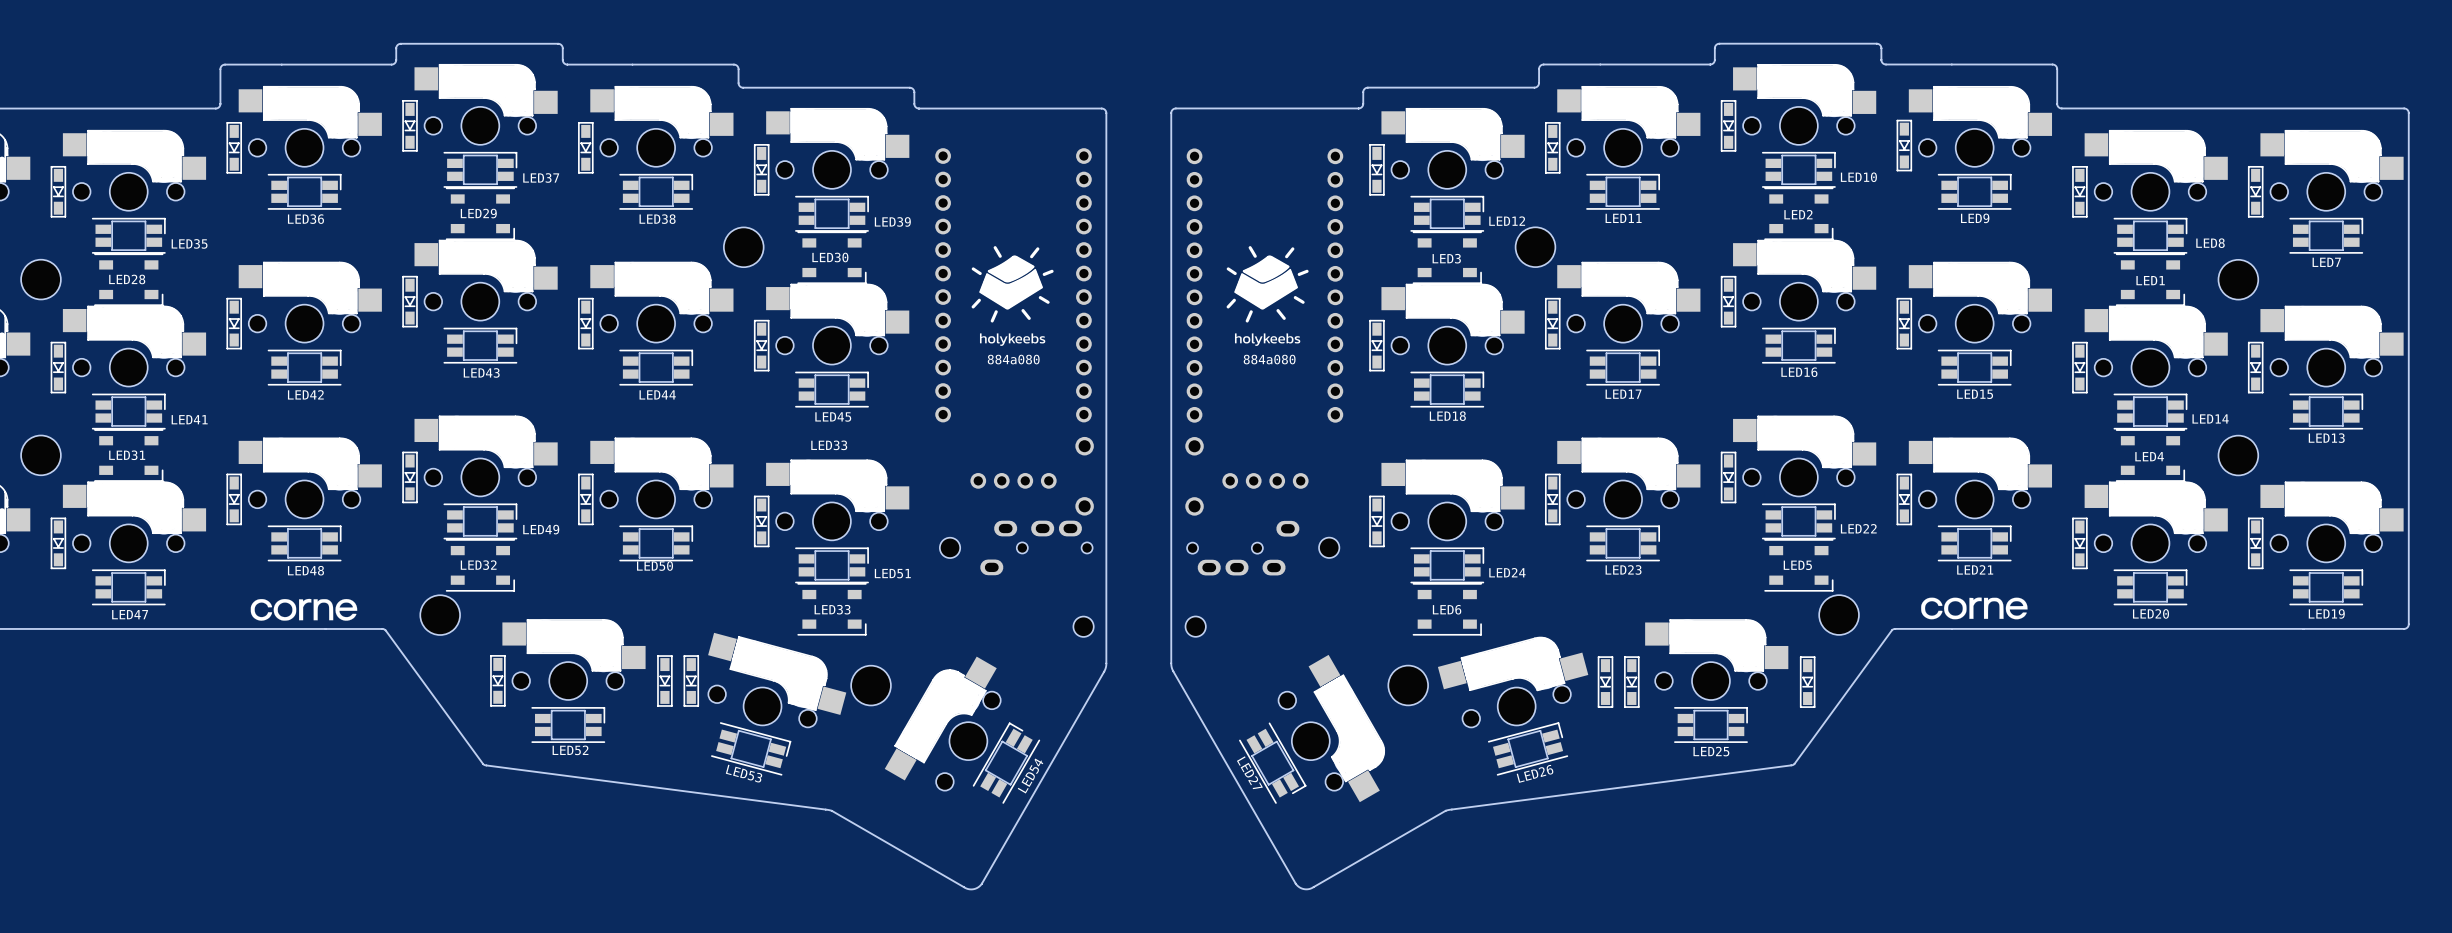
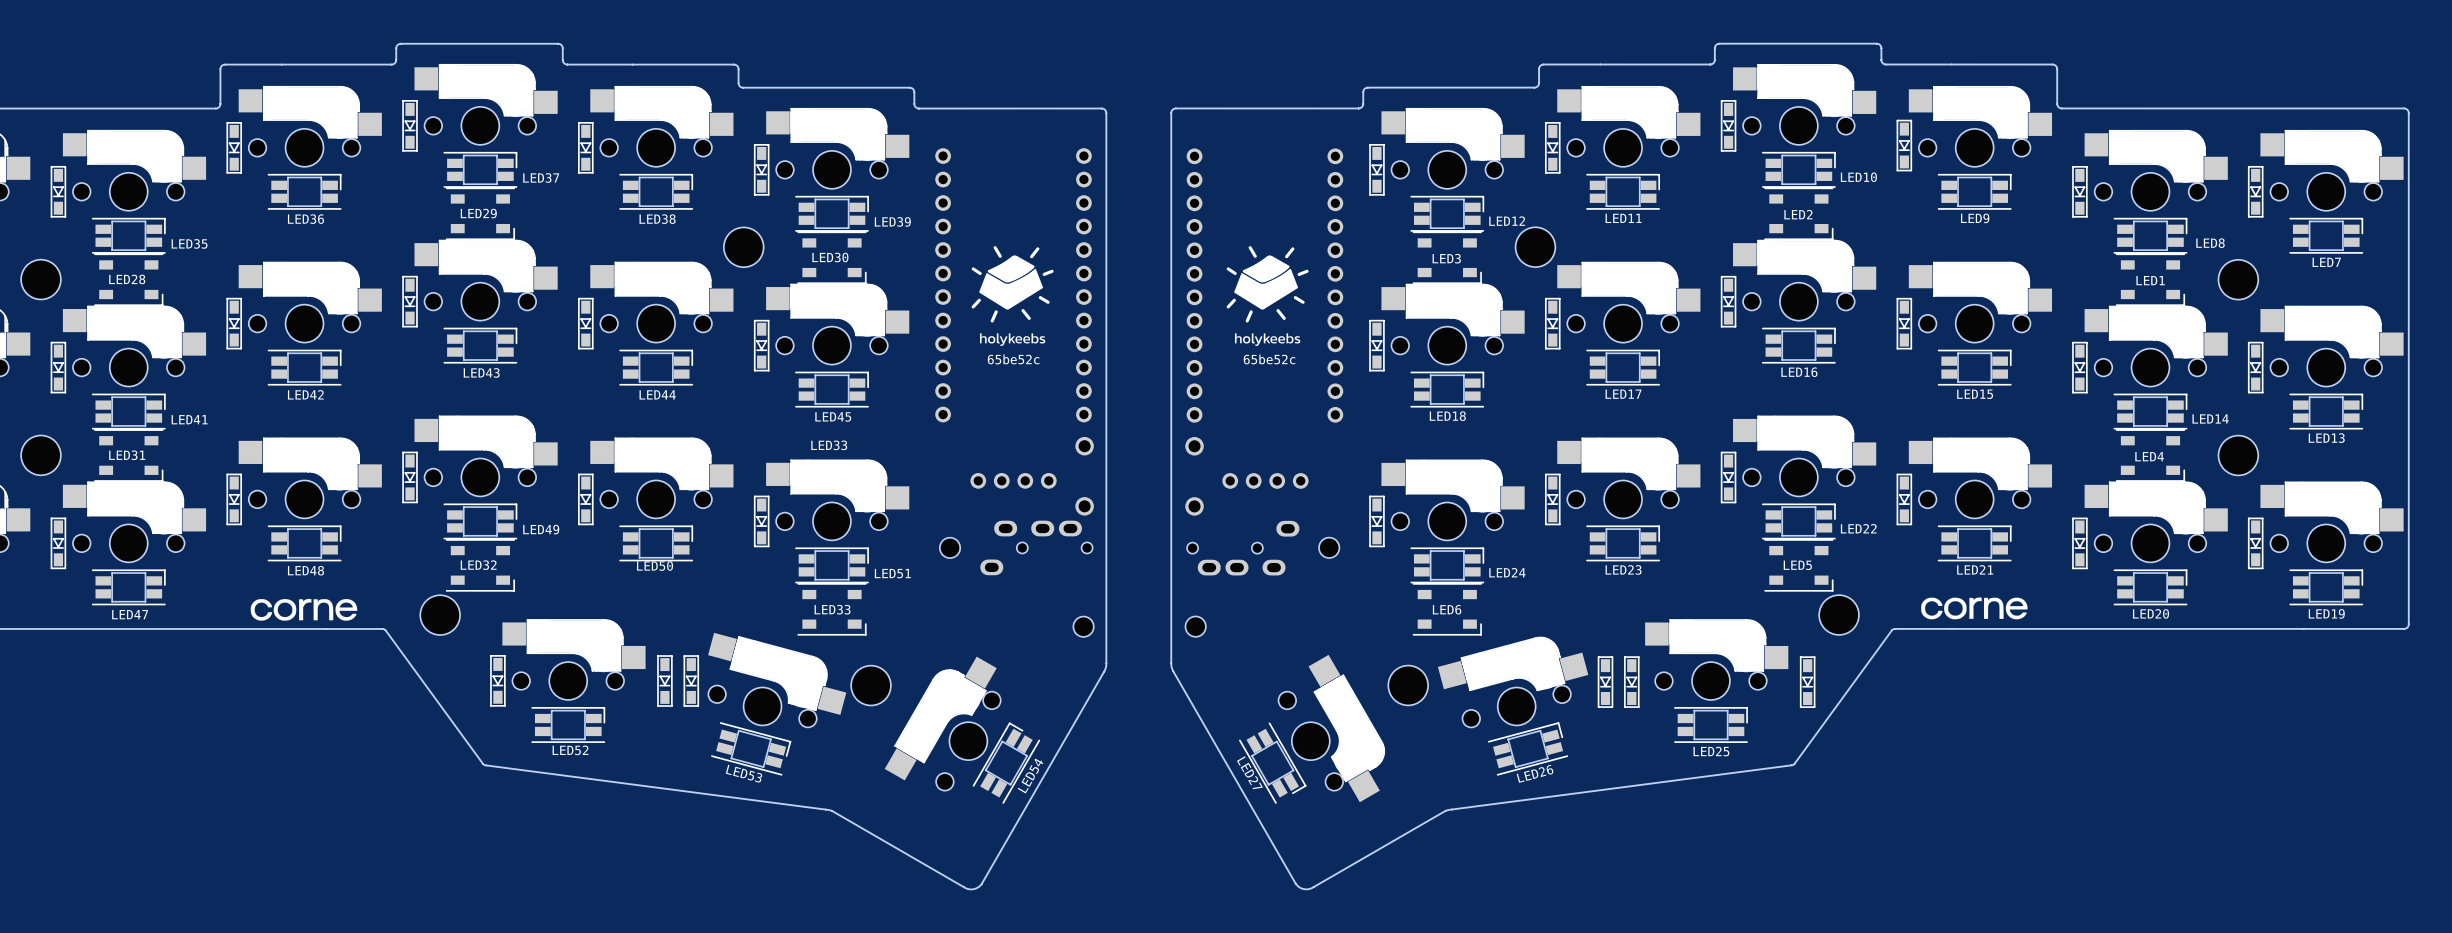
text: 884a080 (1013, 359) -> 65be52c (1013, 359)
text: 884a080 (1269, 359) -> 65be52c (1269, 359)

